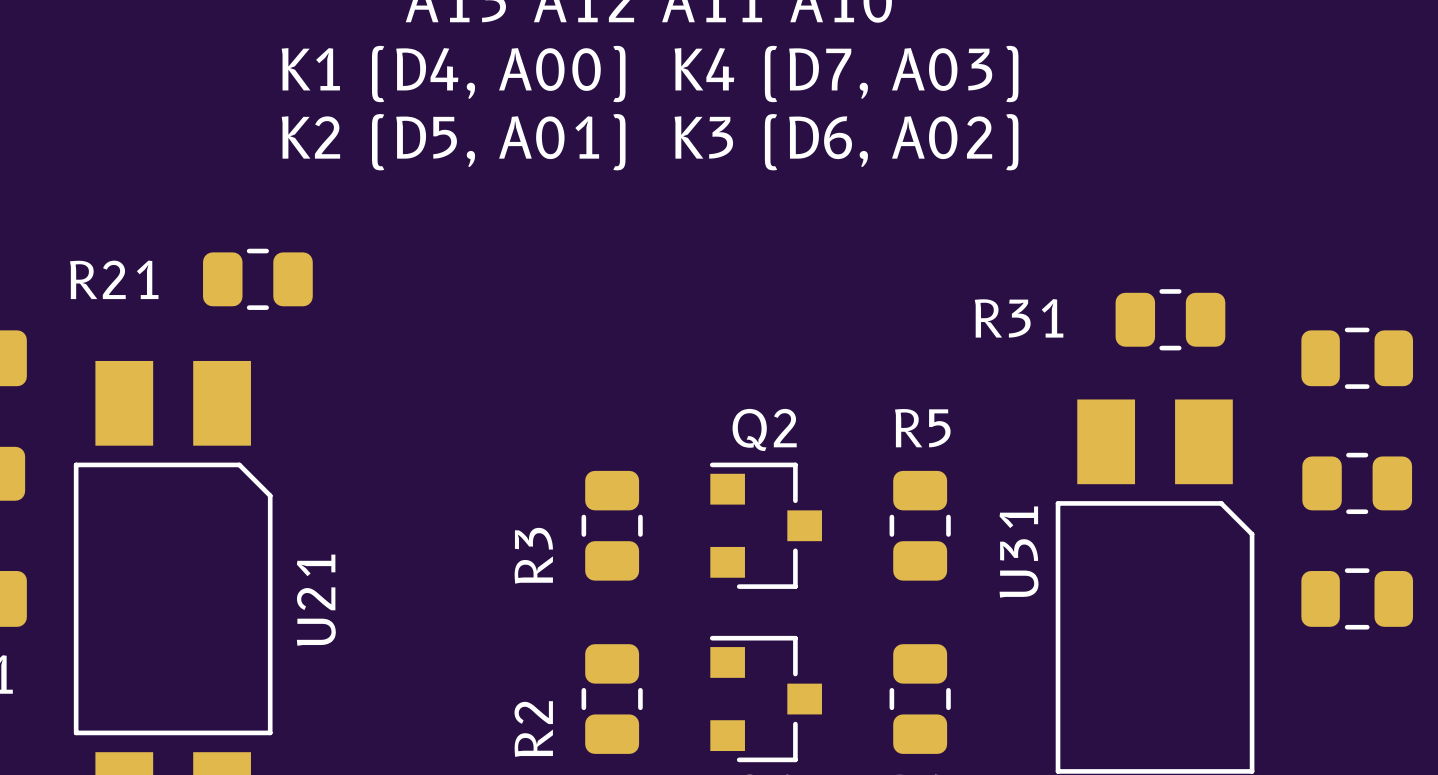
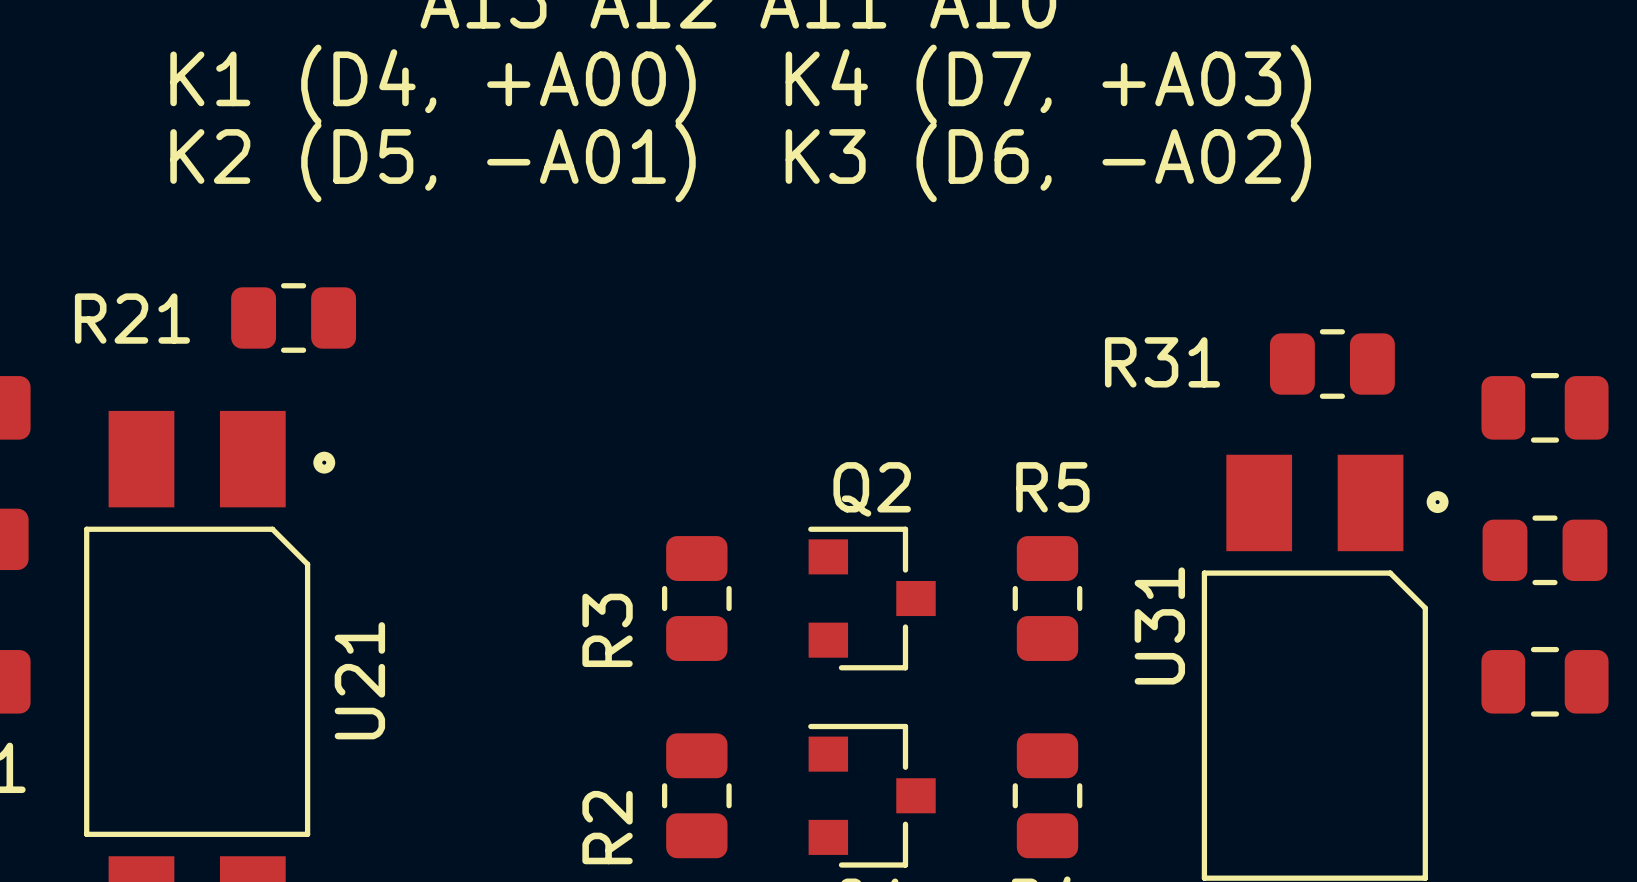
text: K1 (D4, A00) K4 (D7, A03) (650, 74) -> K1 (D4, +A00) K4 (D7, +A03) (740, 84)
text: K2 (D5, A01) K3 (D6, A02) (650, 142) -> K2 (D5, -A01) K3 (D6, -A02) (740, 162)
drawing: none -> [313, 451, 336, 474]
drawing: none -> [1426, 491, 1449, 514]

